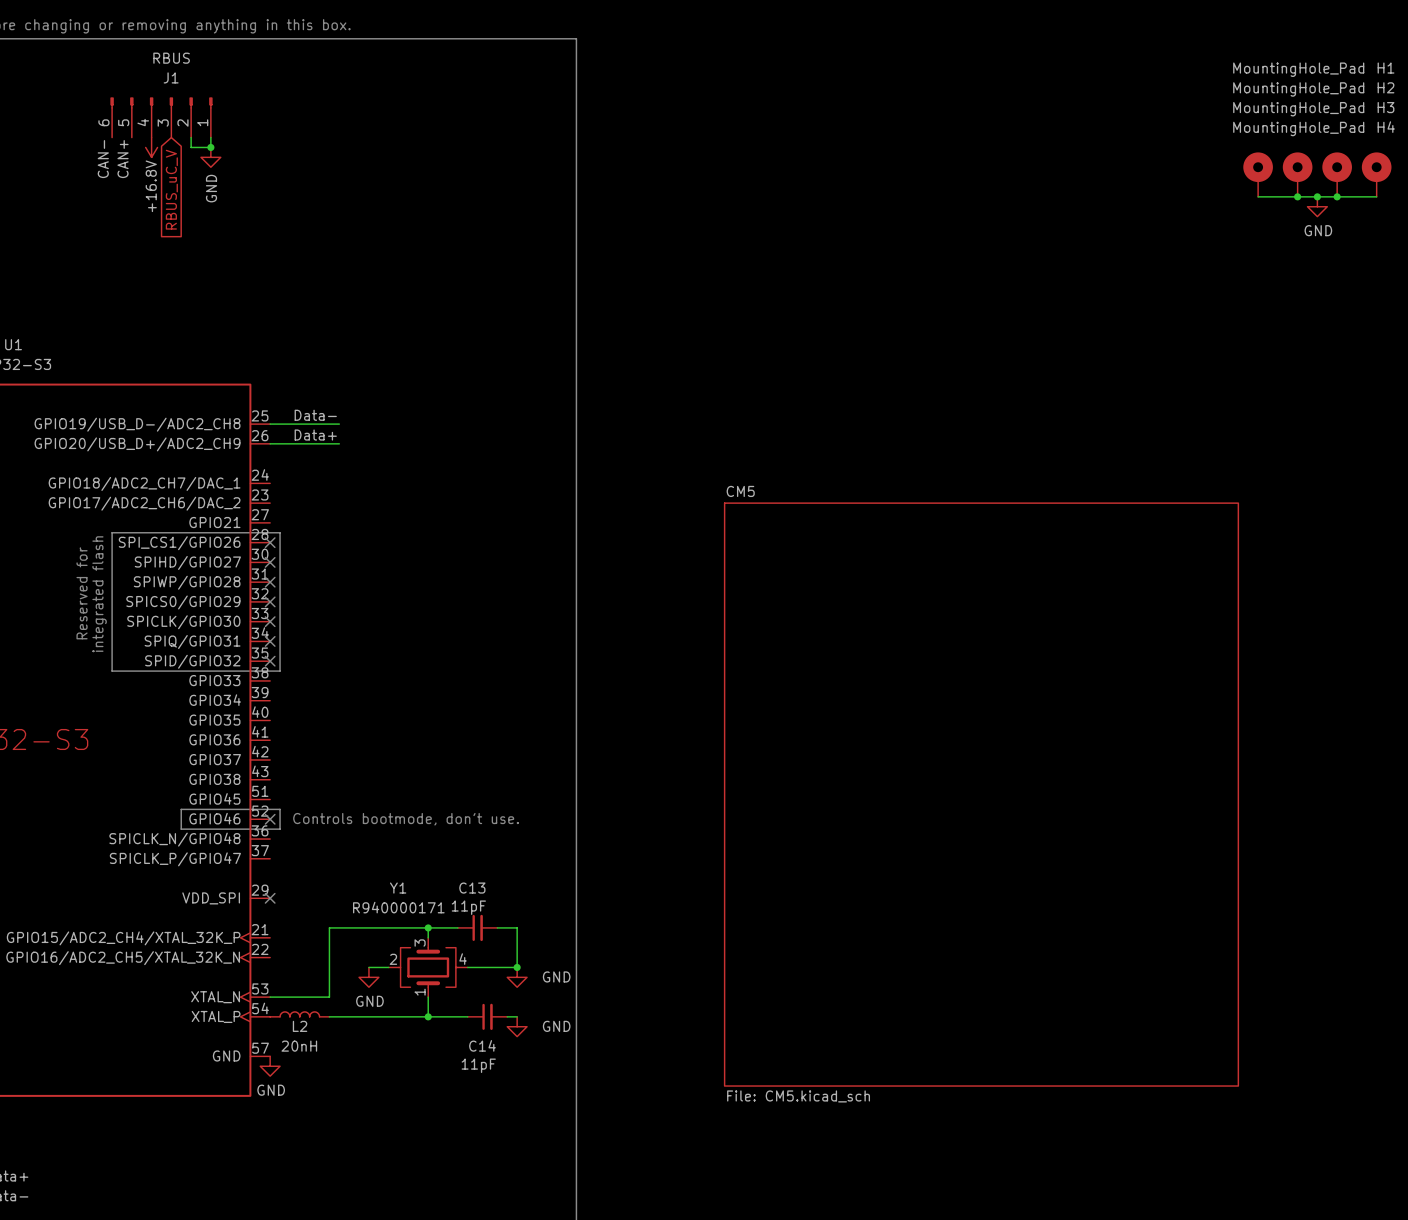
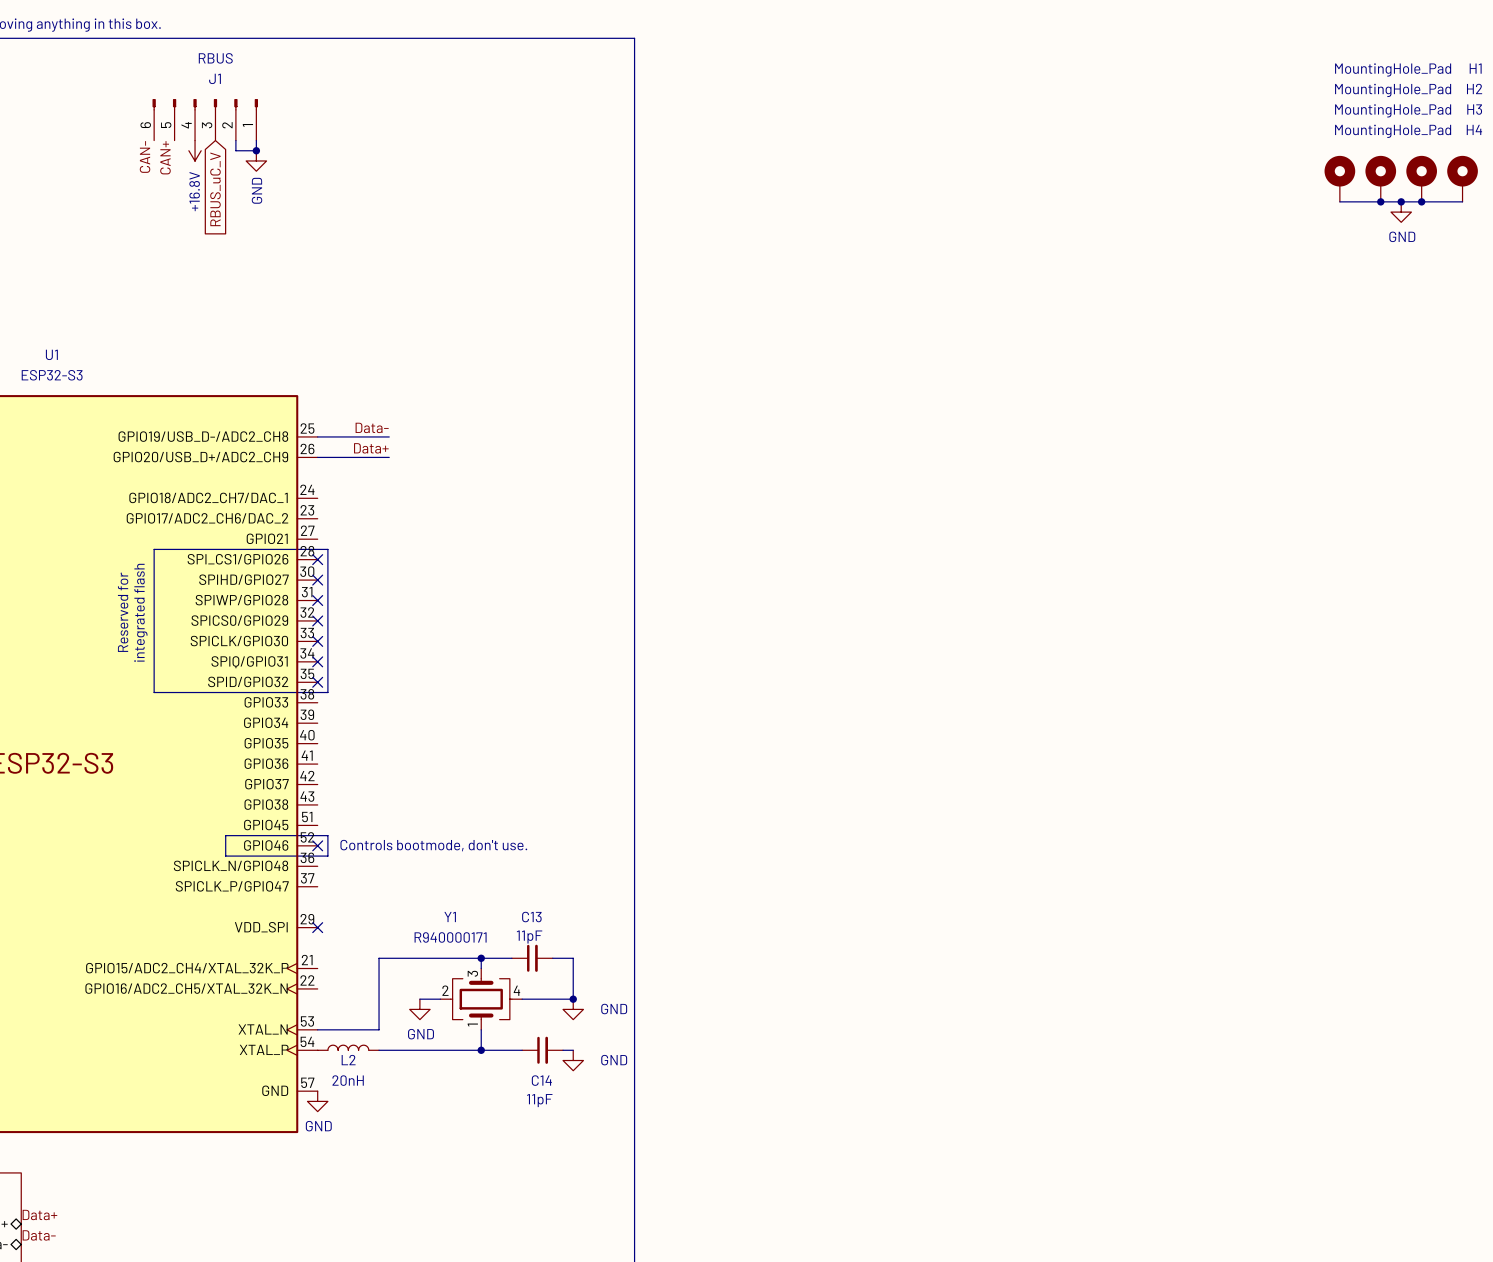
sheet CM5: File: CM5.kicad_sch (981, 794) -> none

